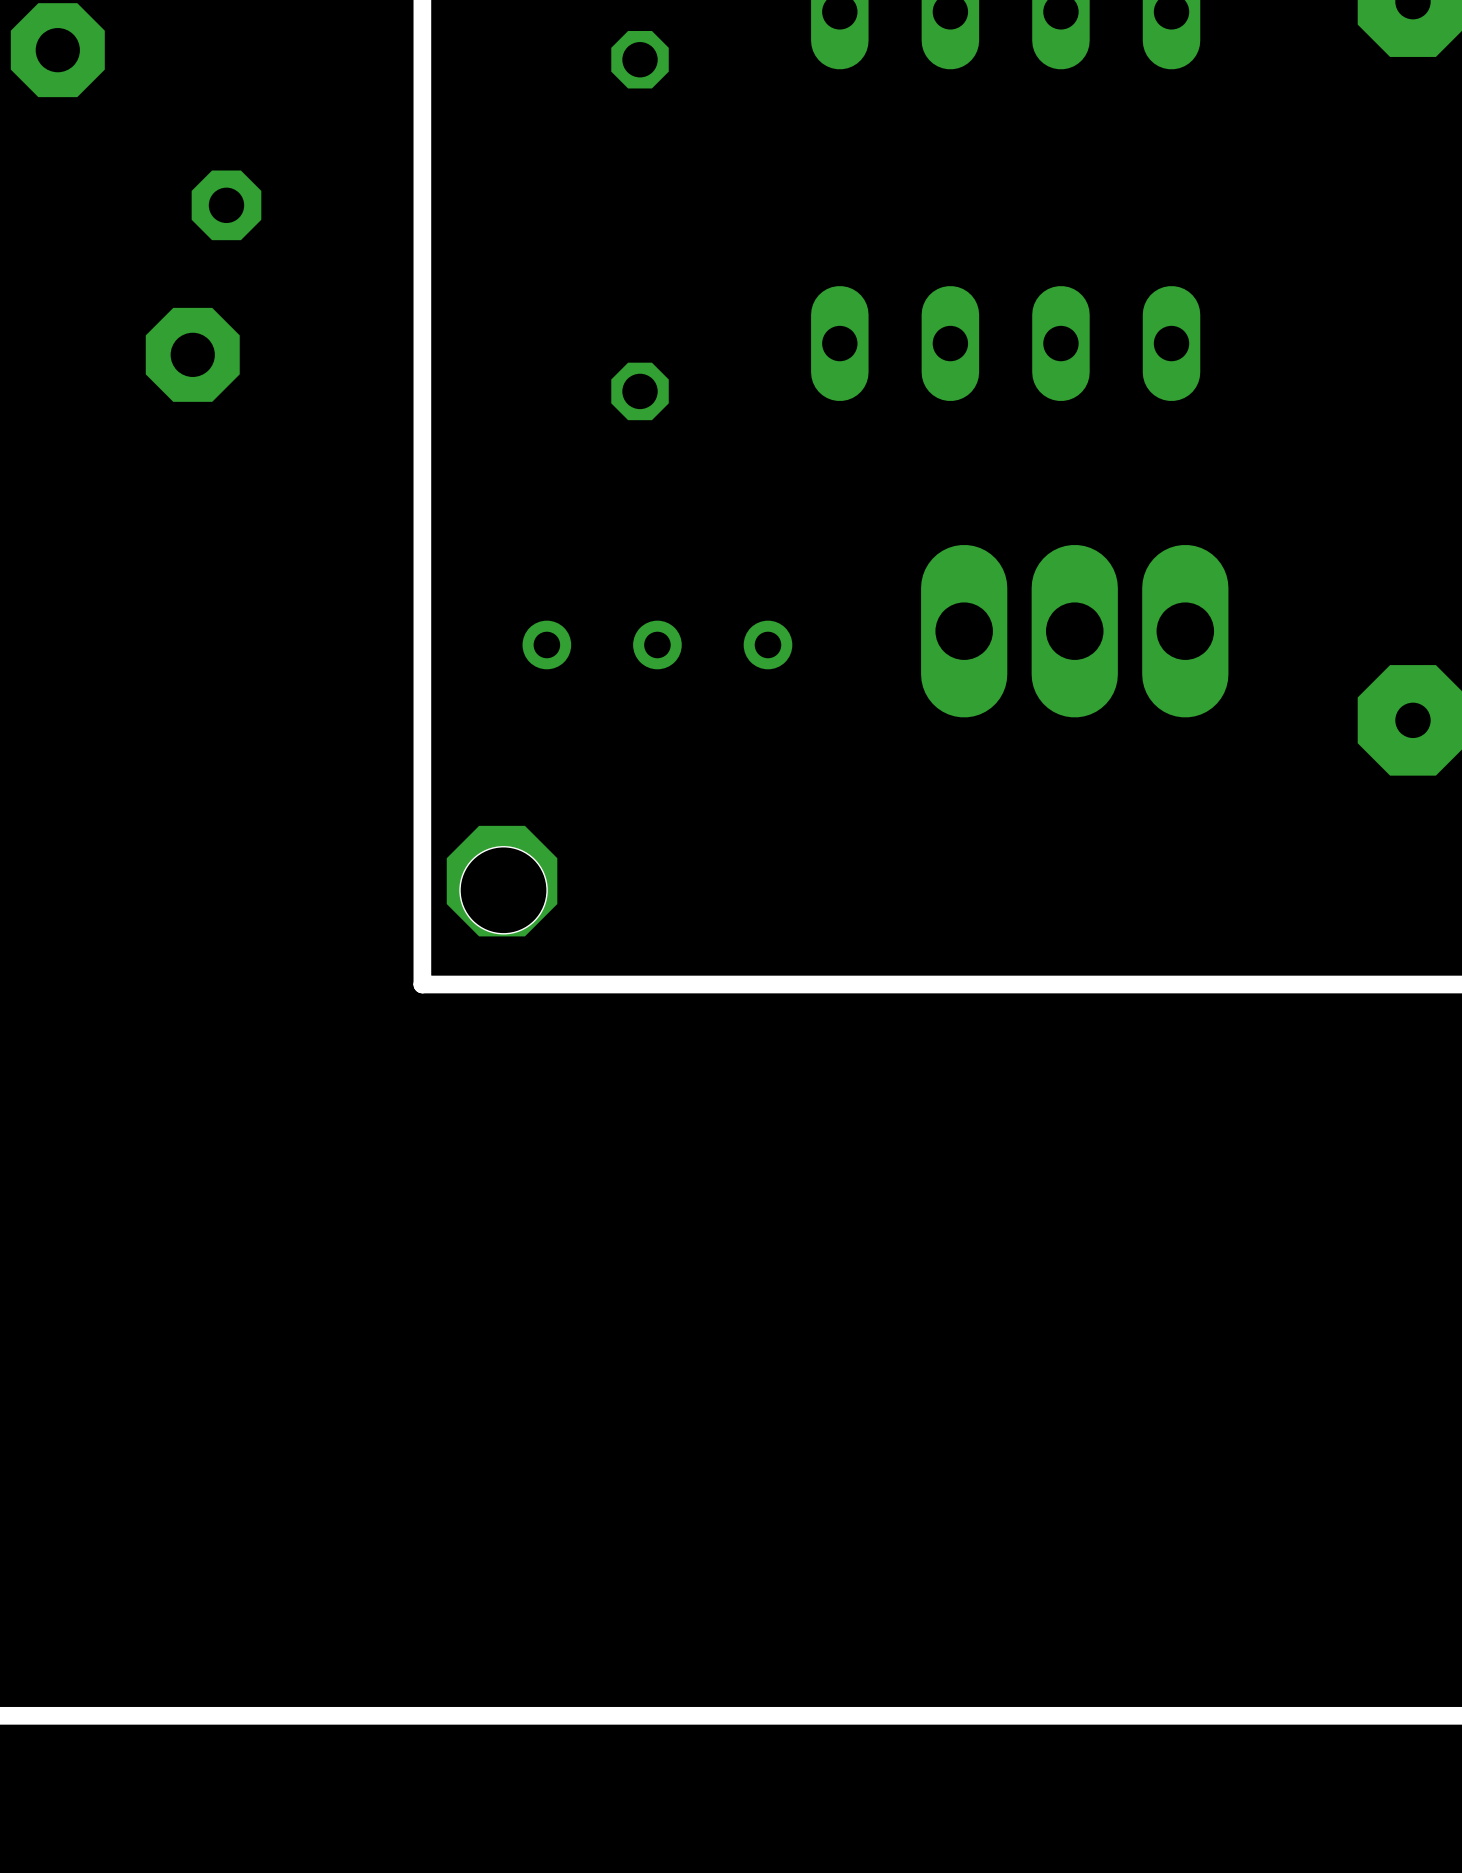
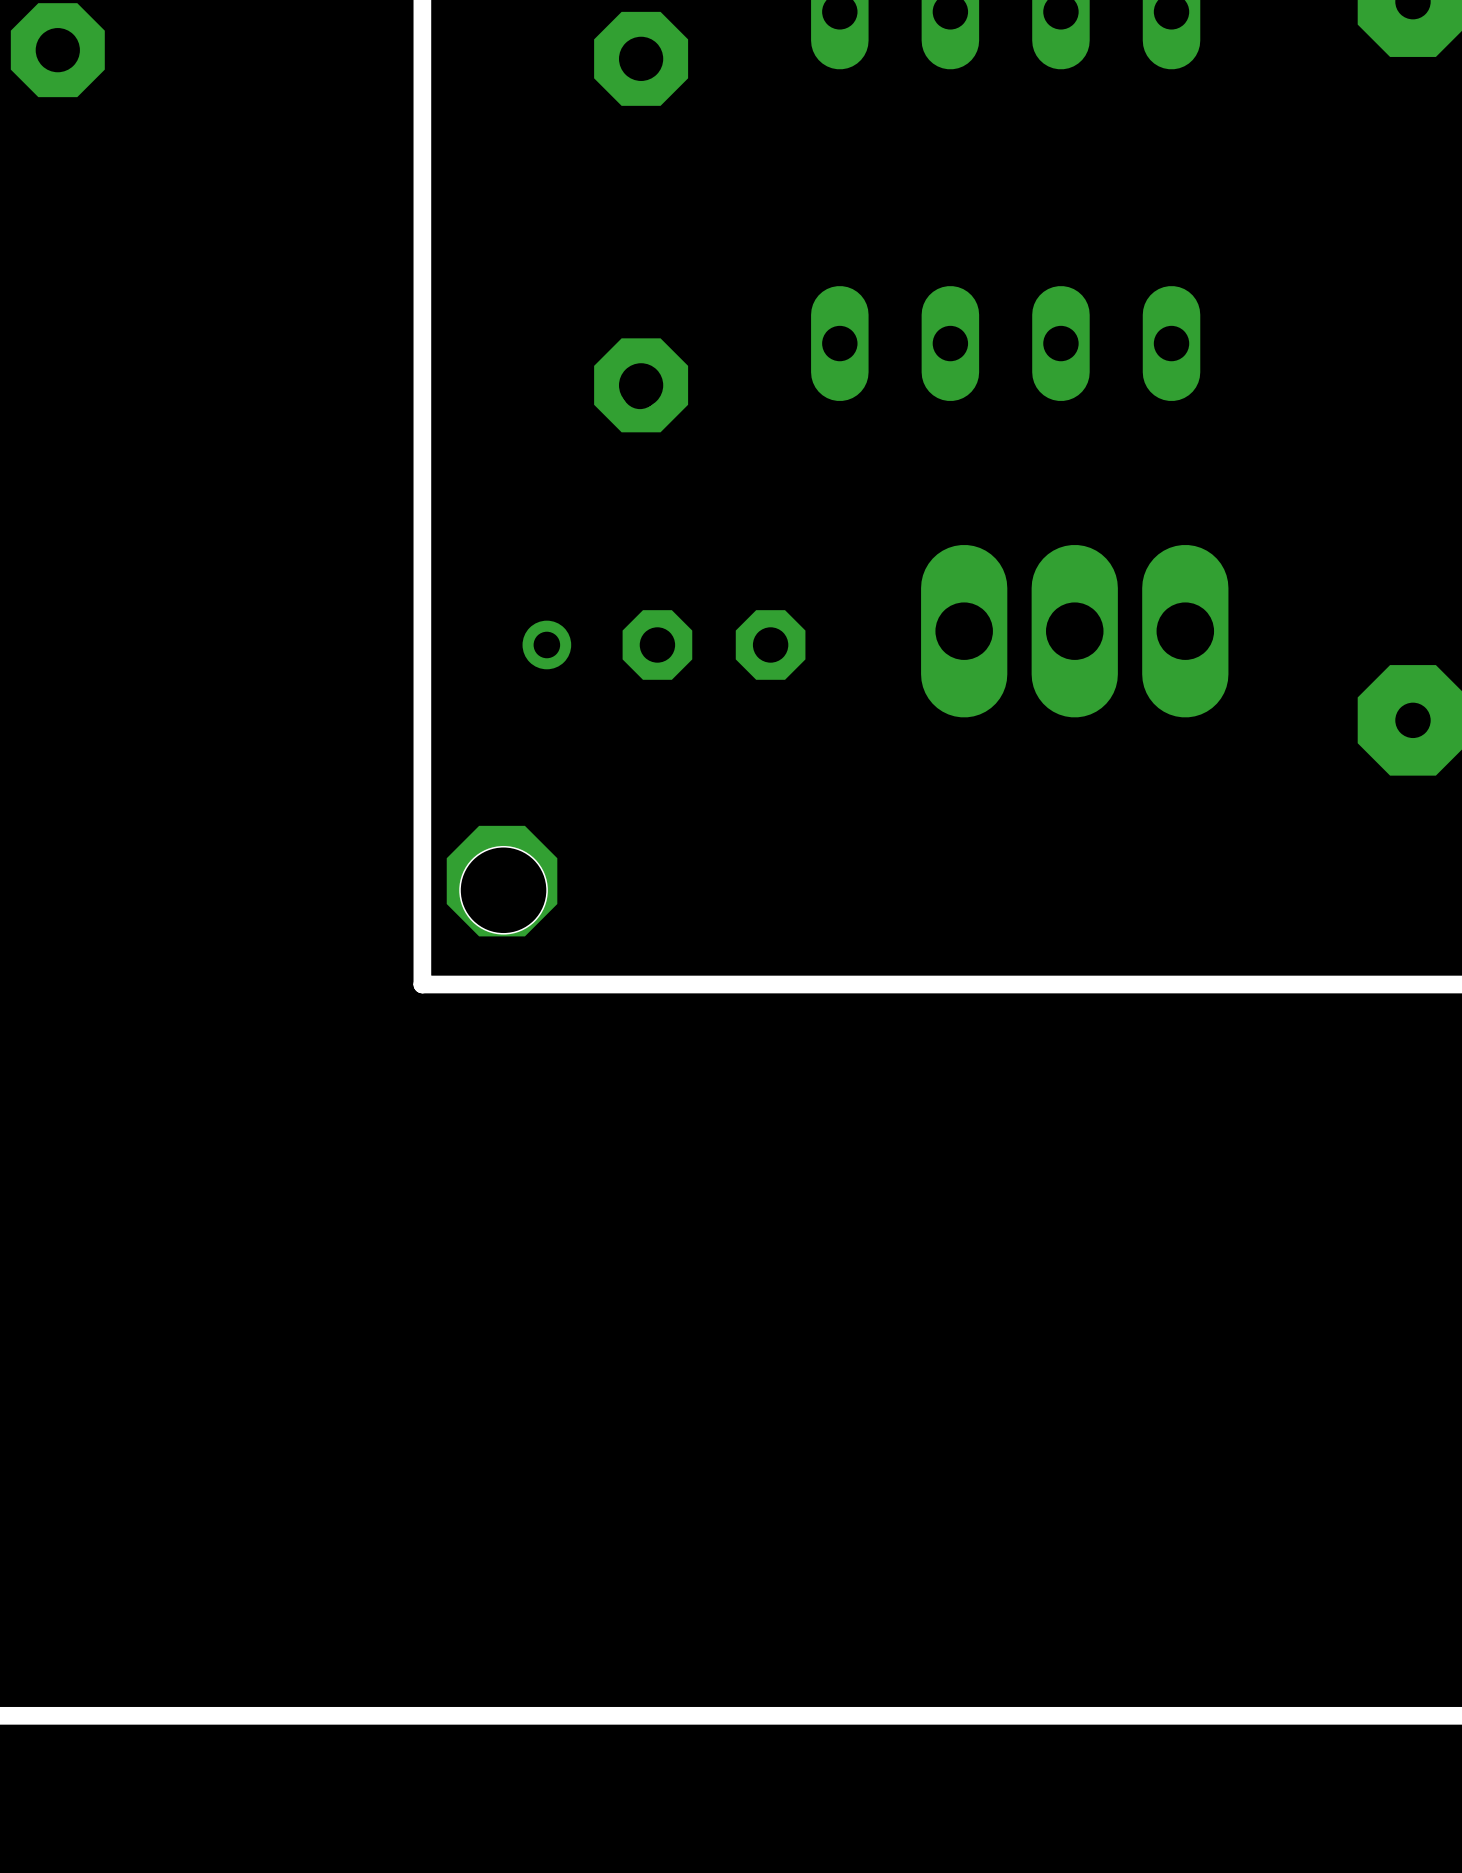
part: none -> (641, 58)
part: (226, 205) -> none
part: (192, 354) -> none
part: none -> (641, 385)
part: none -> (657, 644)
part: none -> (770, 644)

